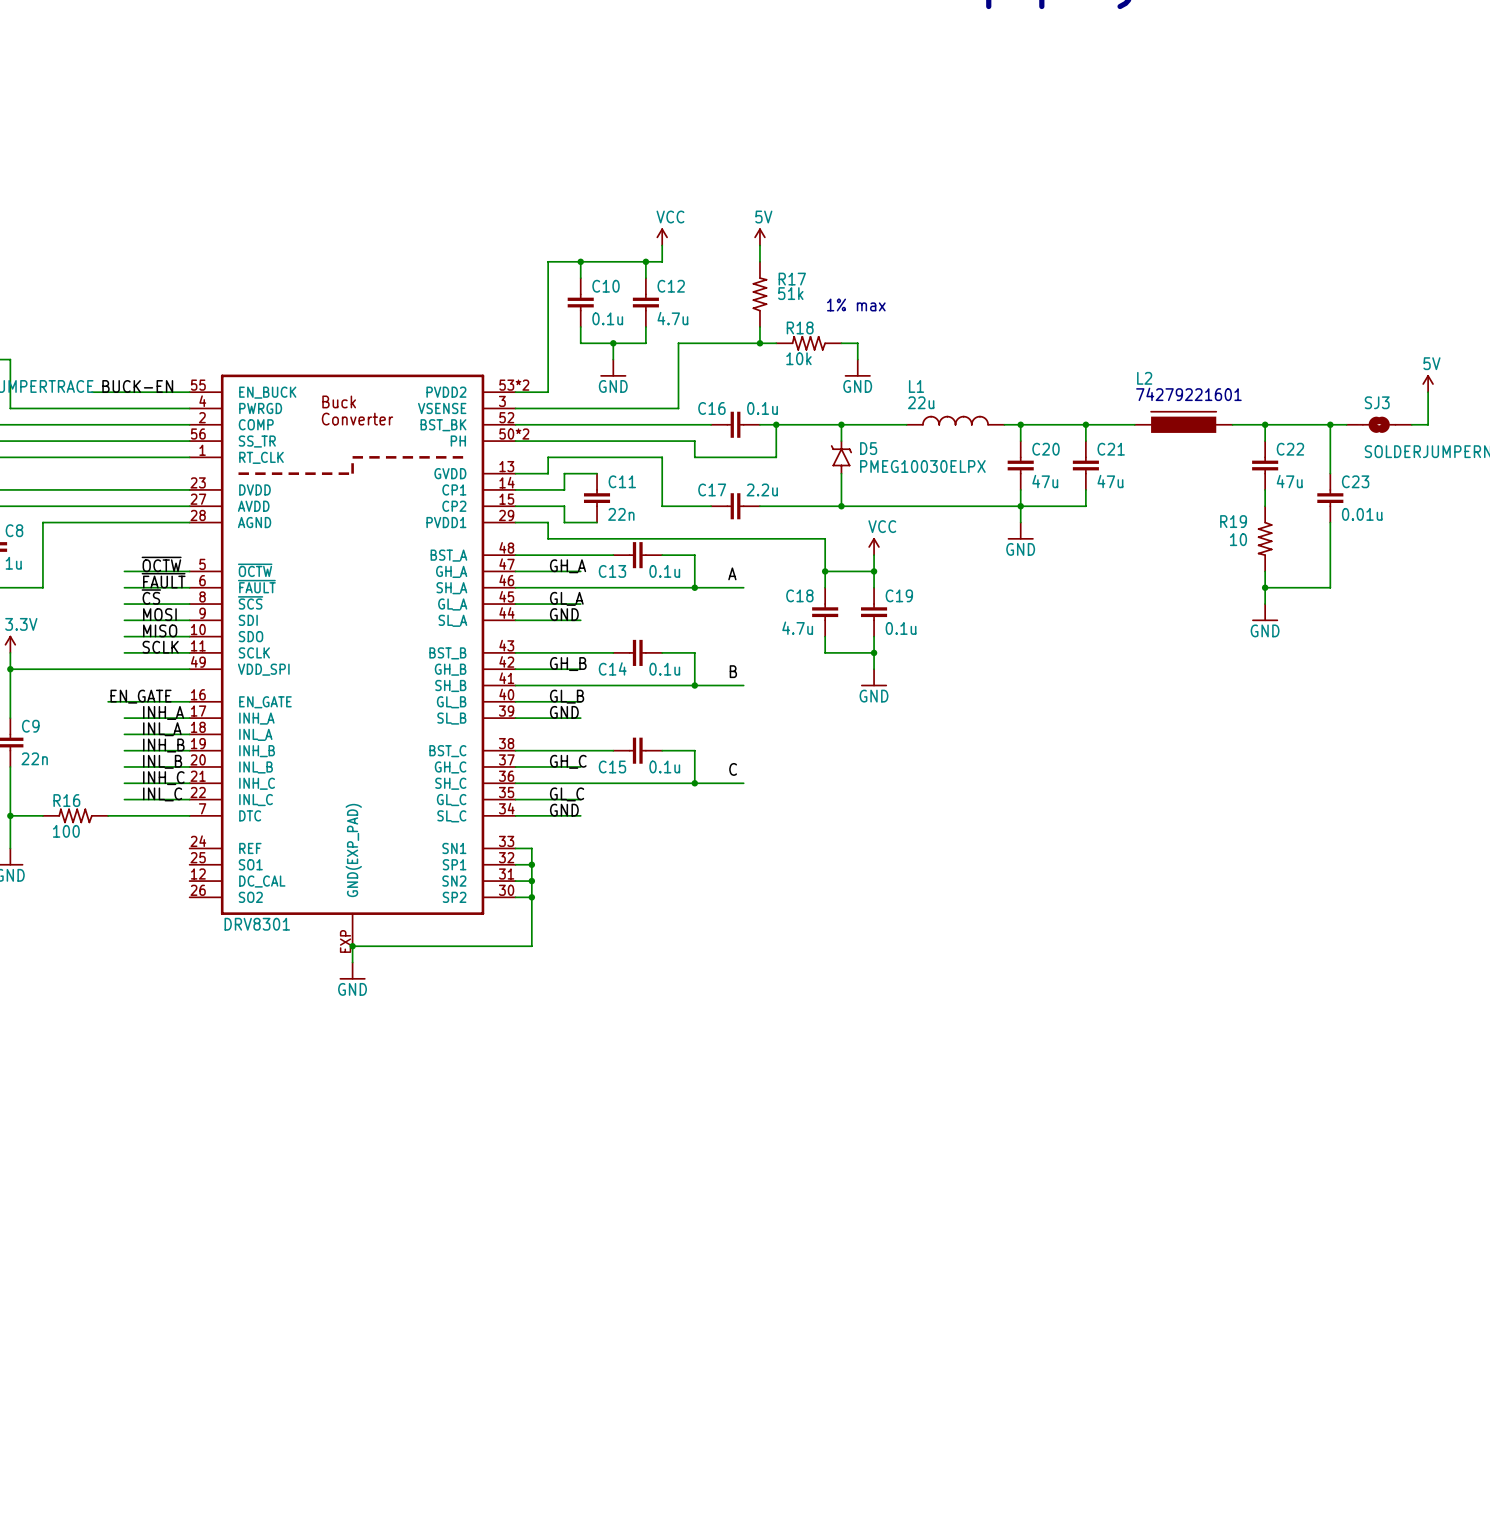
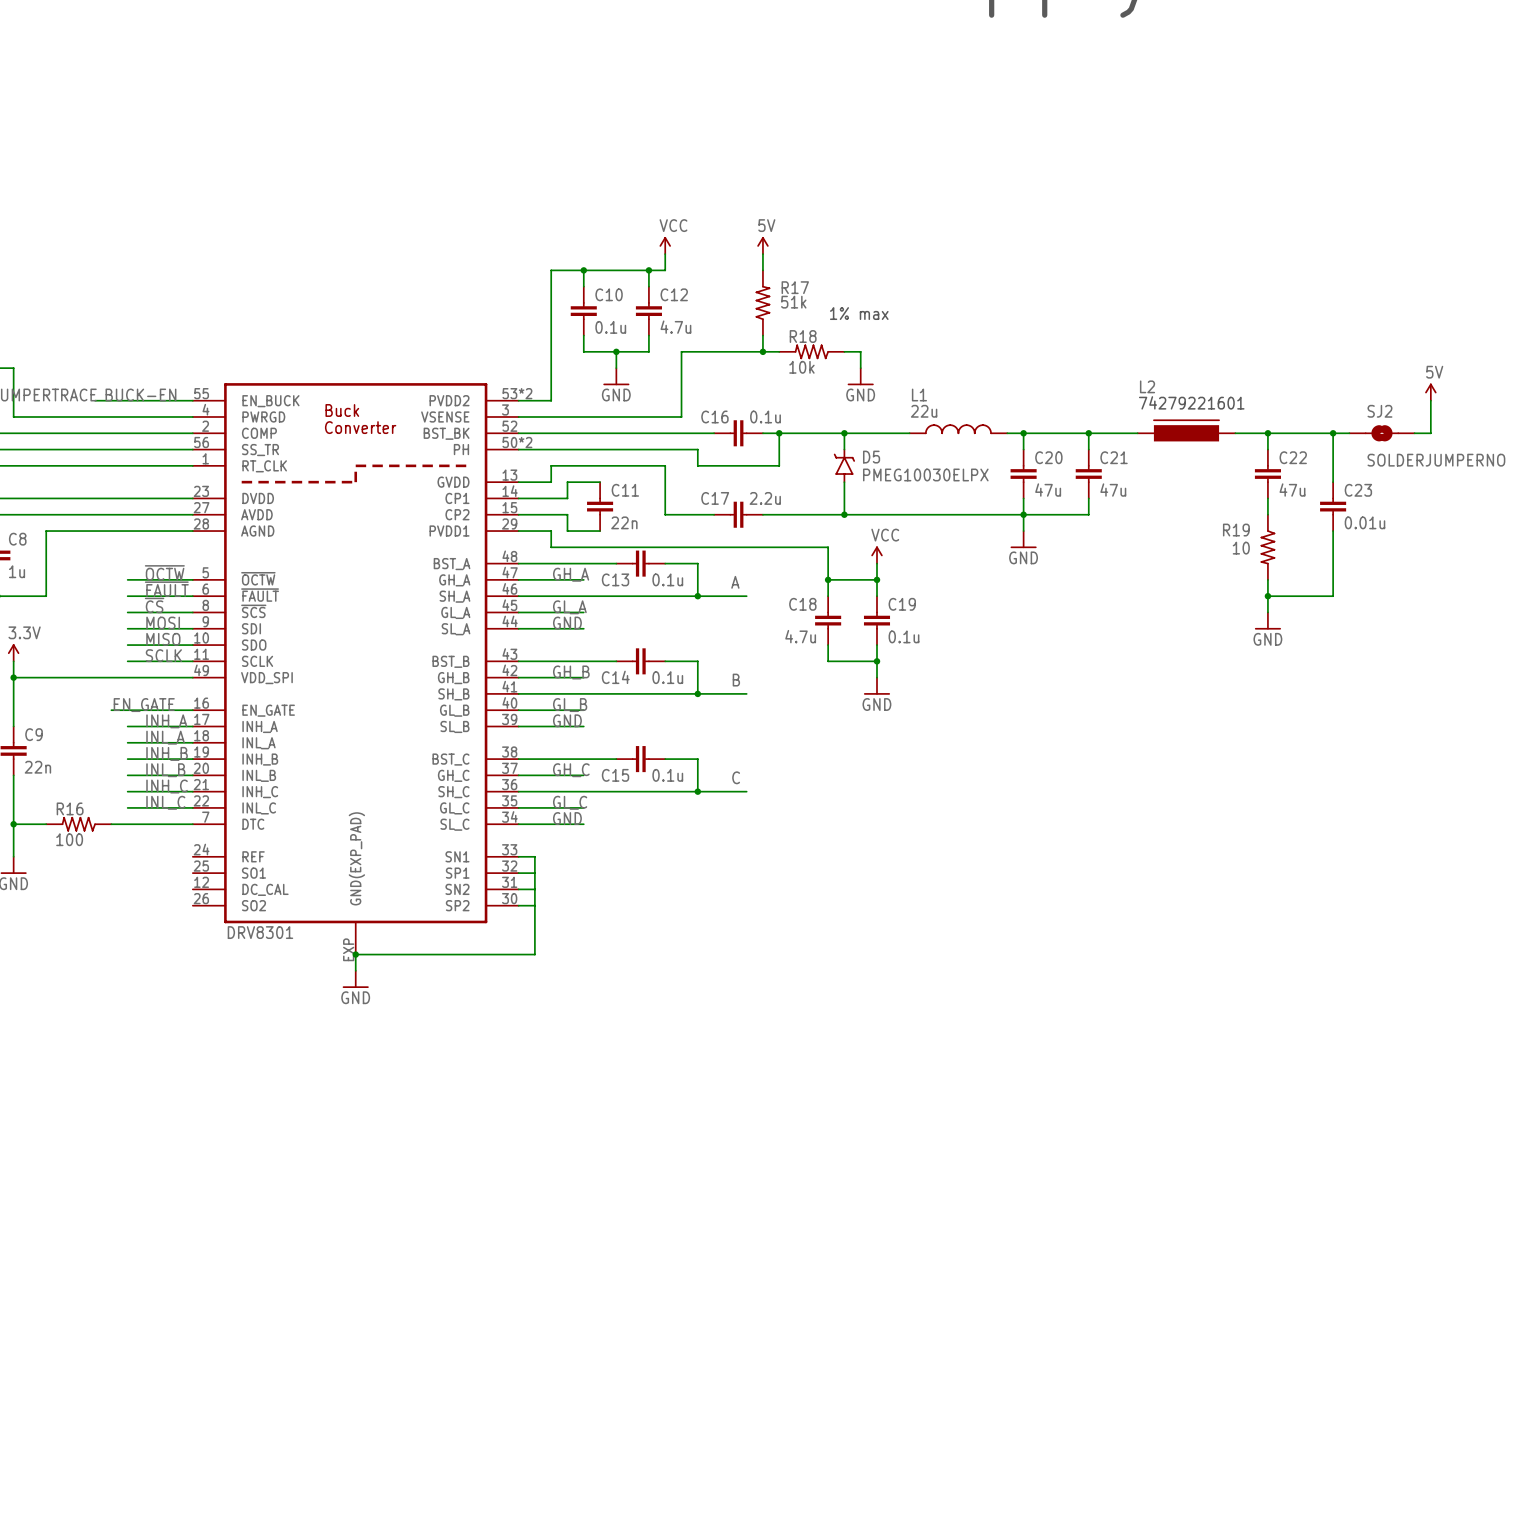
SJ3 name: SJ3 (1377, 402) -> SJ2 (1379, 411)
junction: (531, 864) -> none
junction: (531, 881) -> none
junction: (531, 897) -> none

